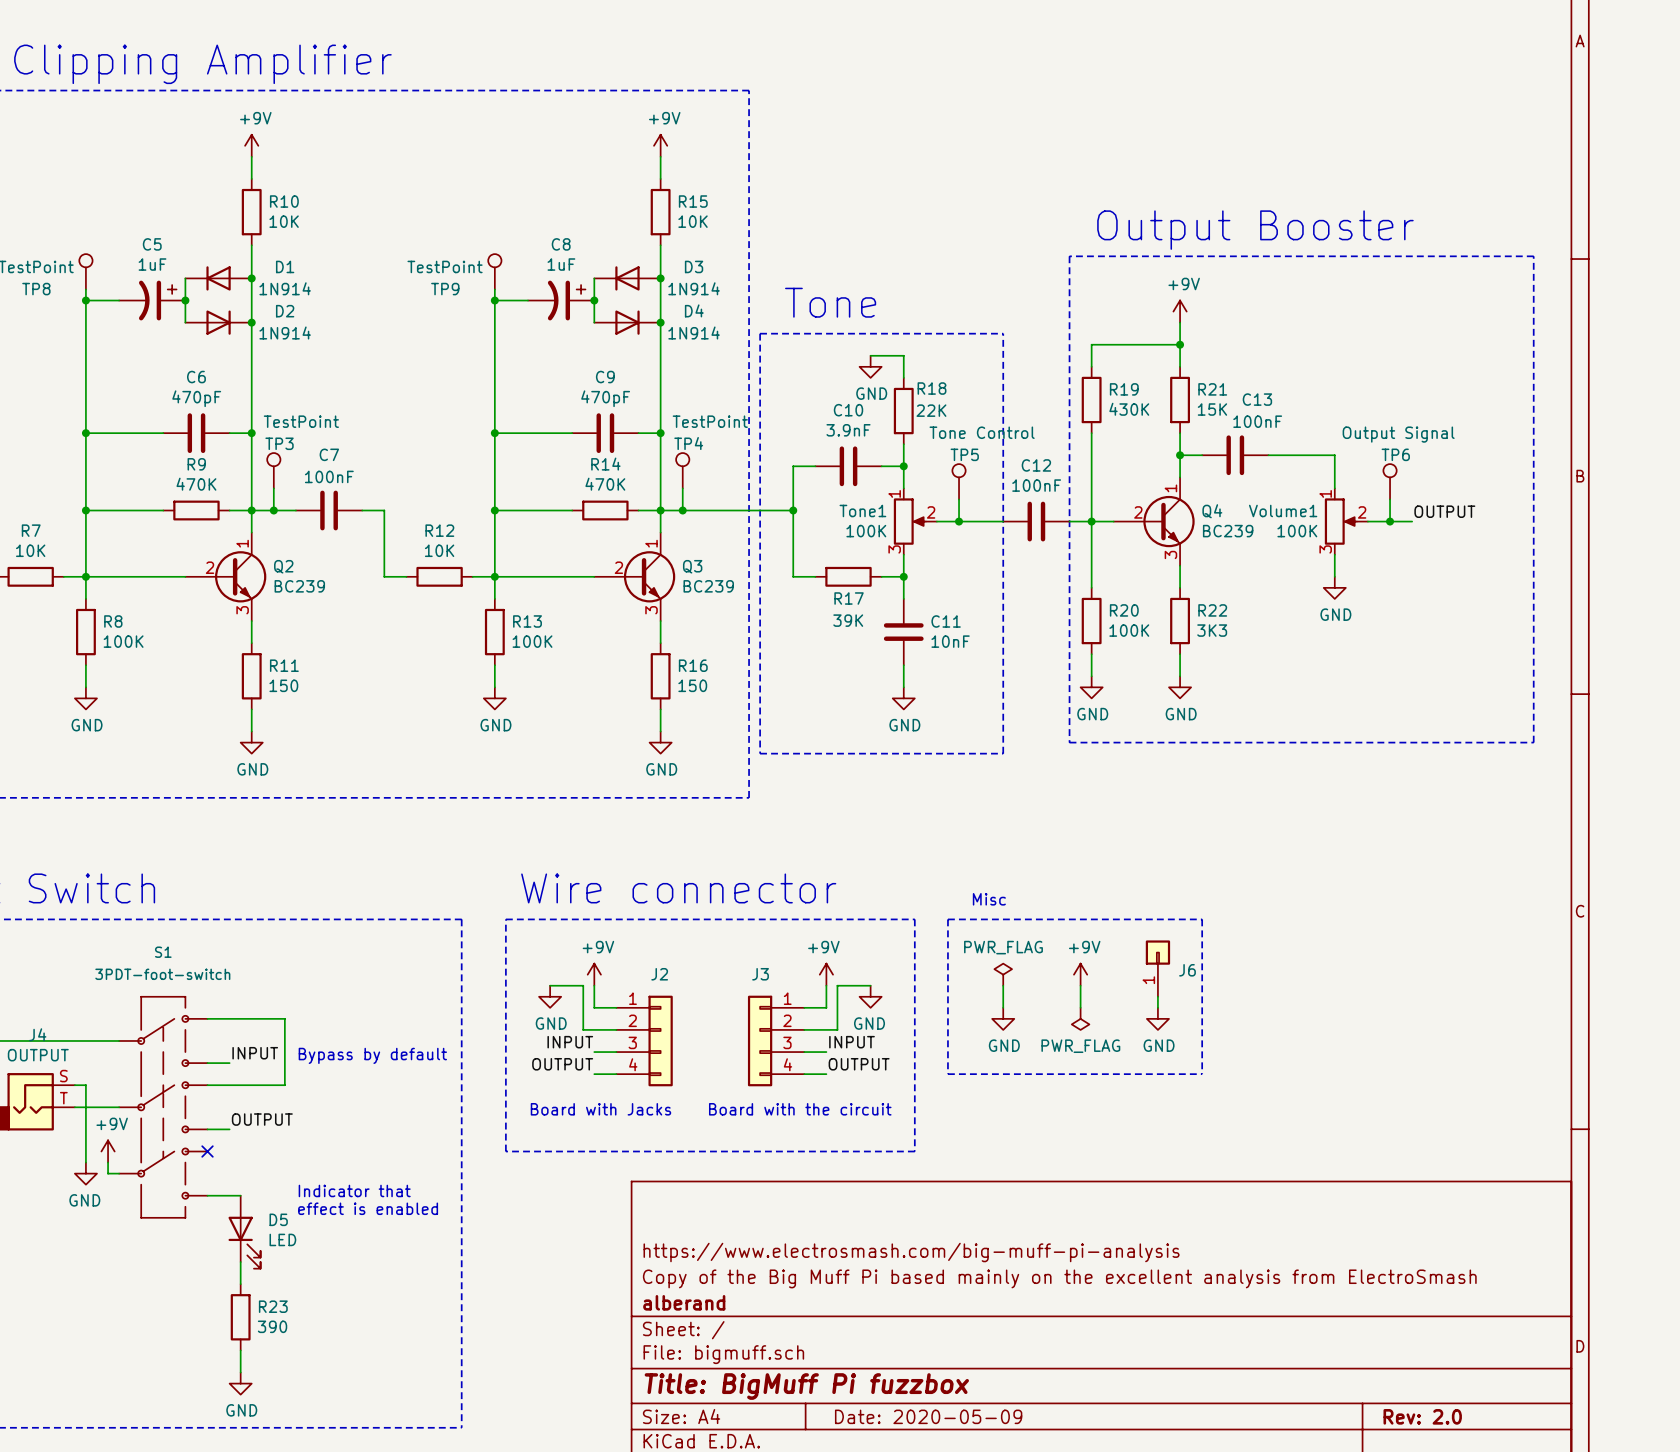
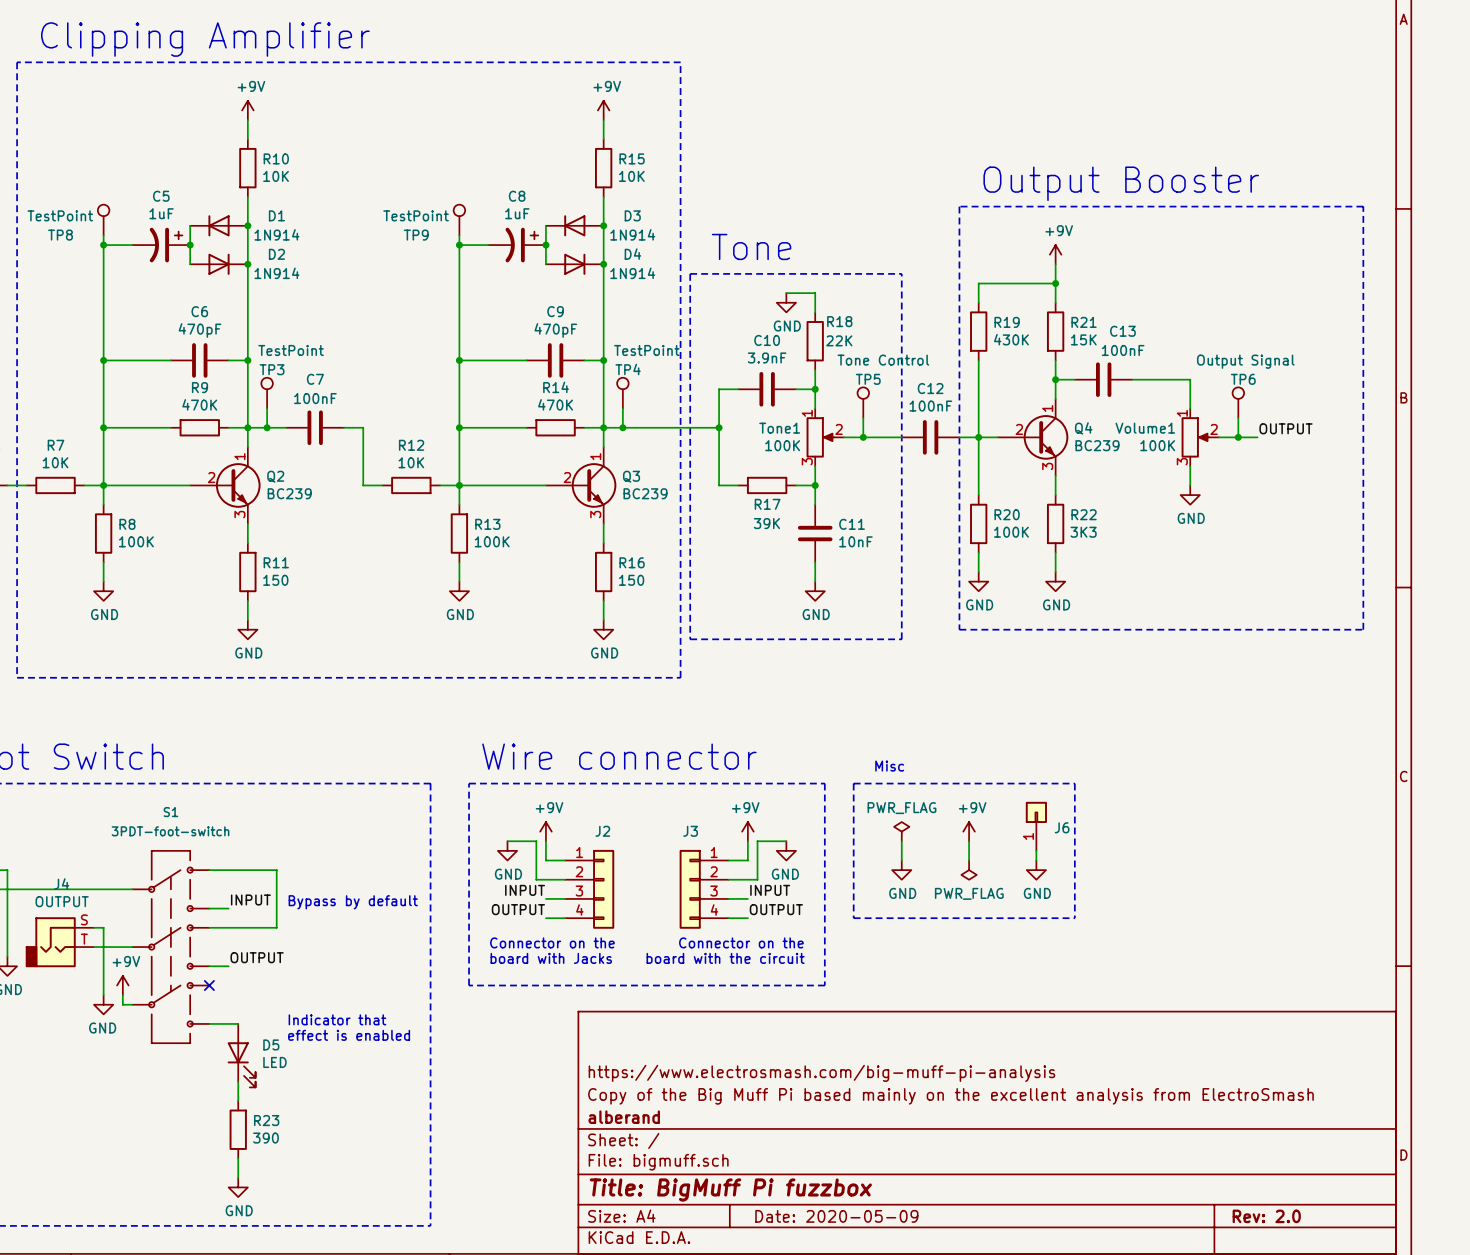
text: none -> Connector on the (552, 942)
text: none -> Connector on the (741, 942)
text: Board with Jacks (600, 1109) -> board with Jacks (551, 958)
text: Board with the circuit (800, 1109) -> board with the circuit (725, 958)

